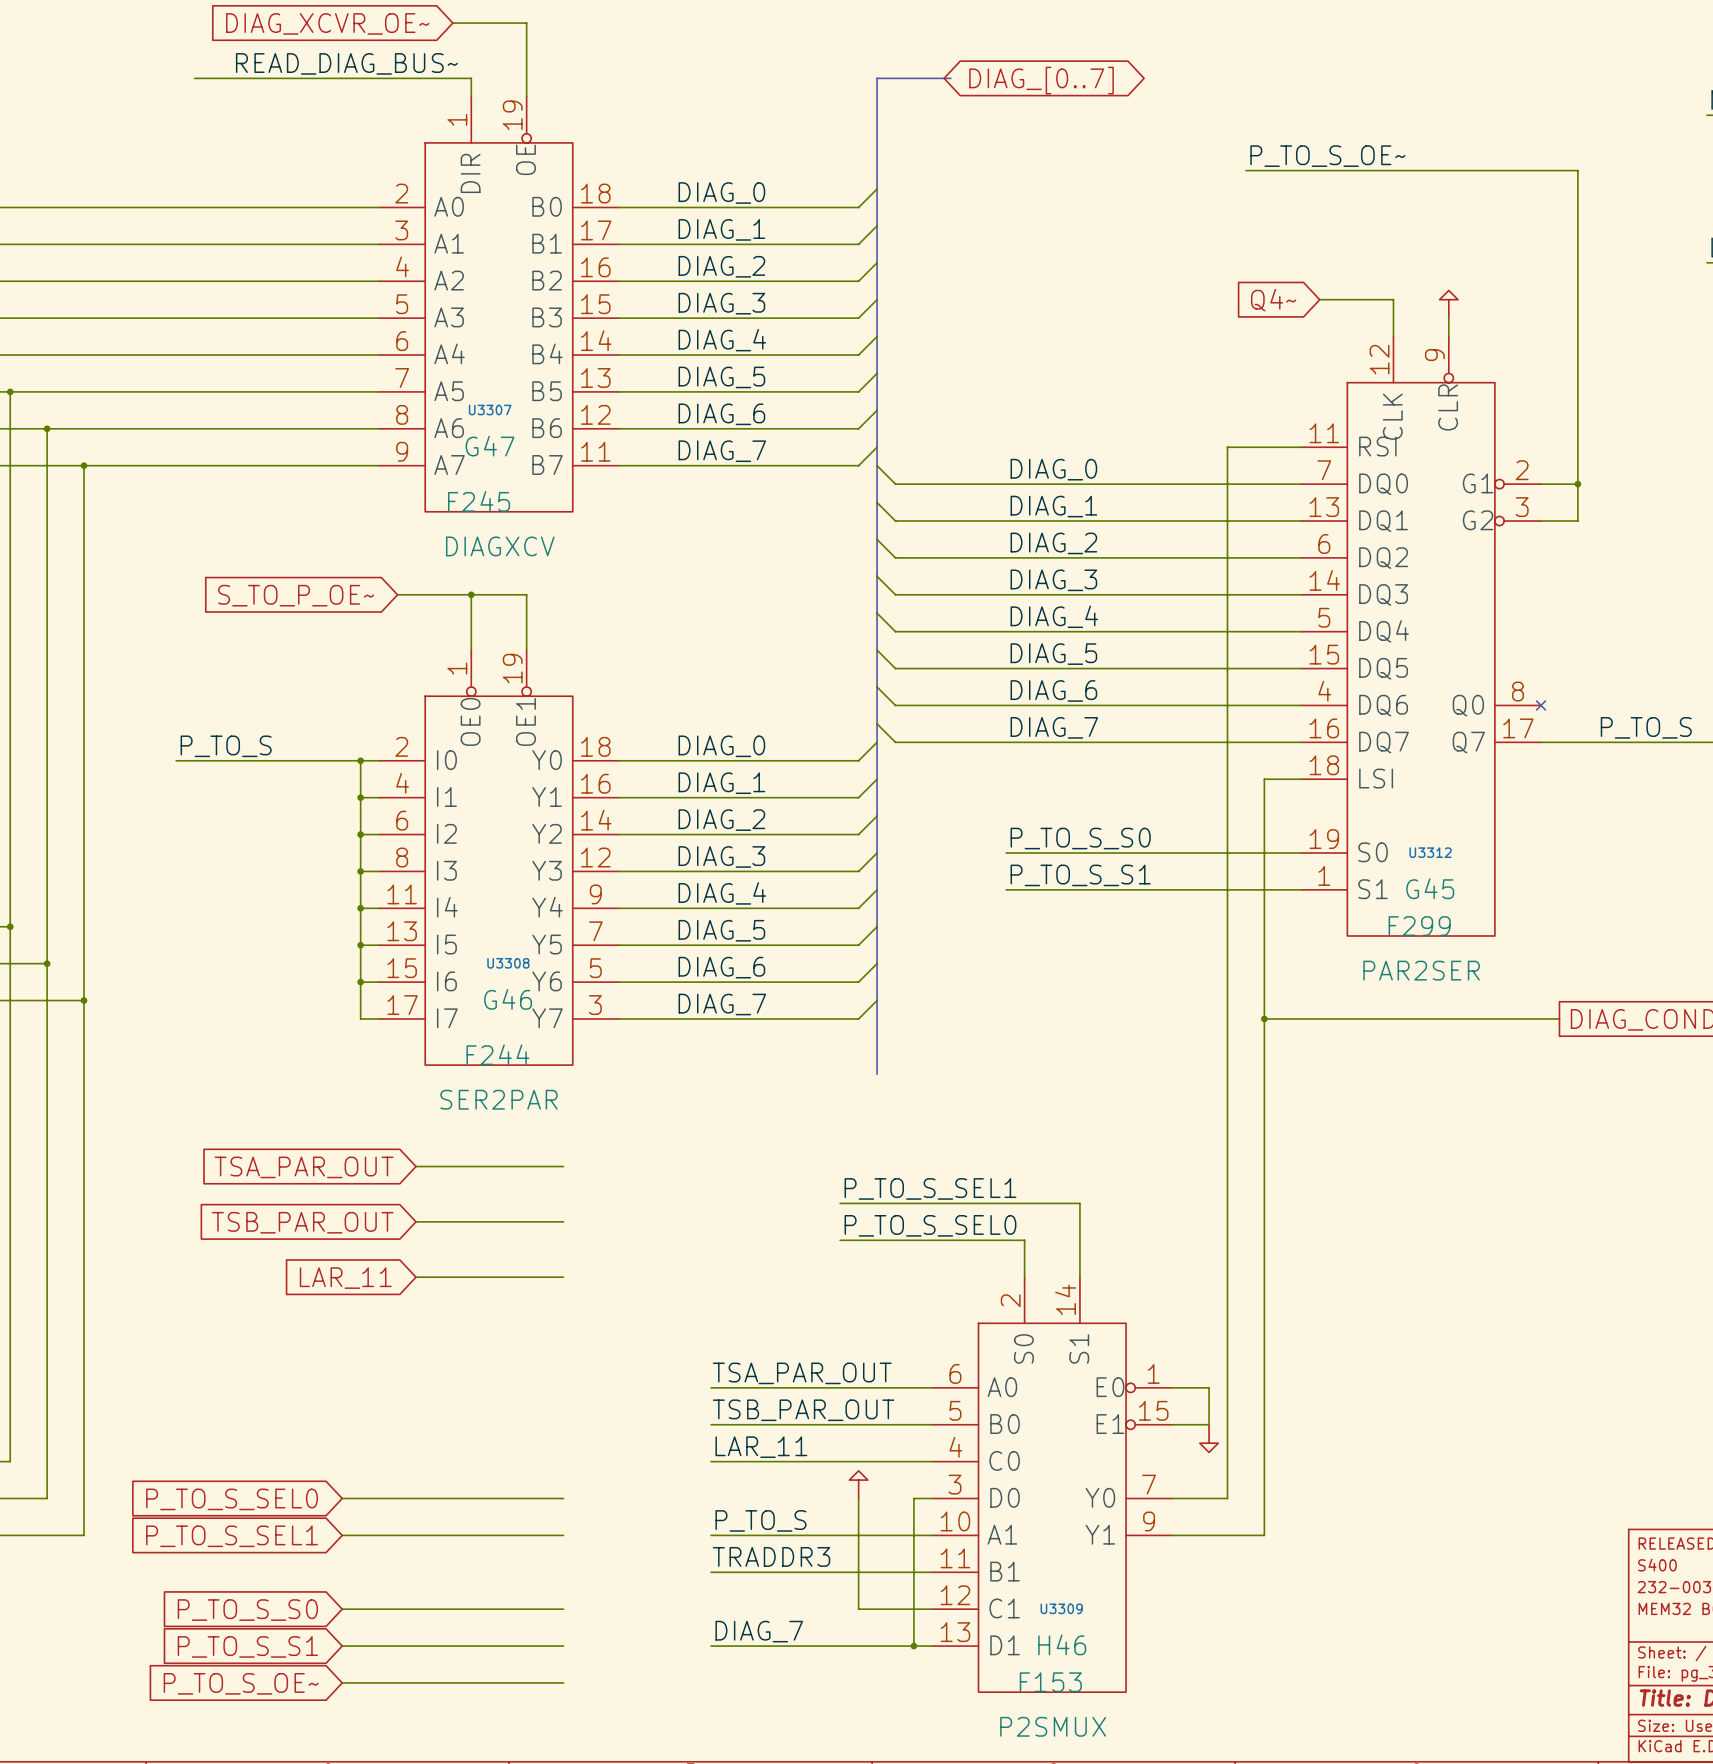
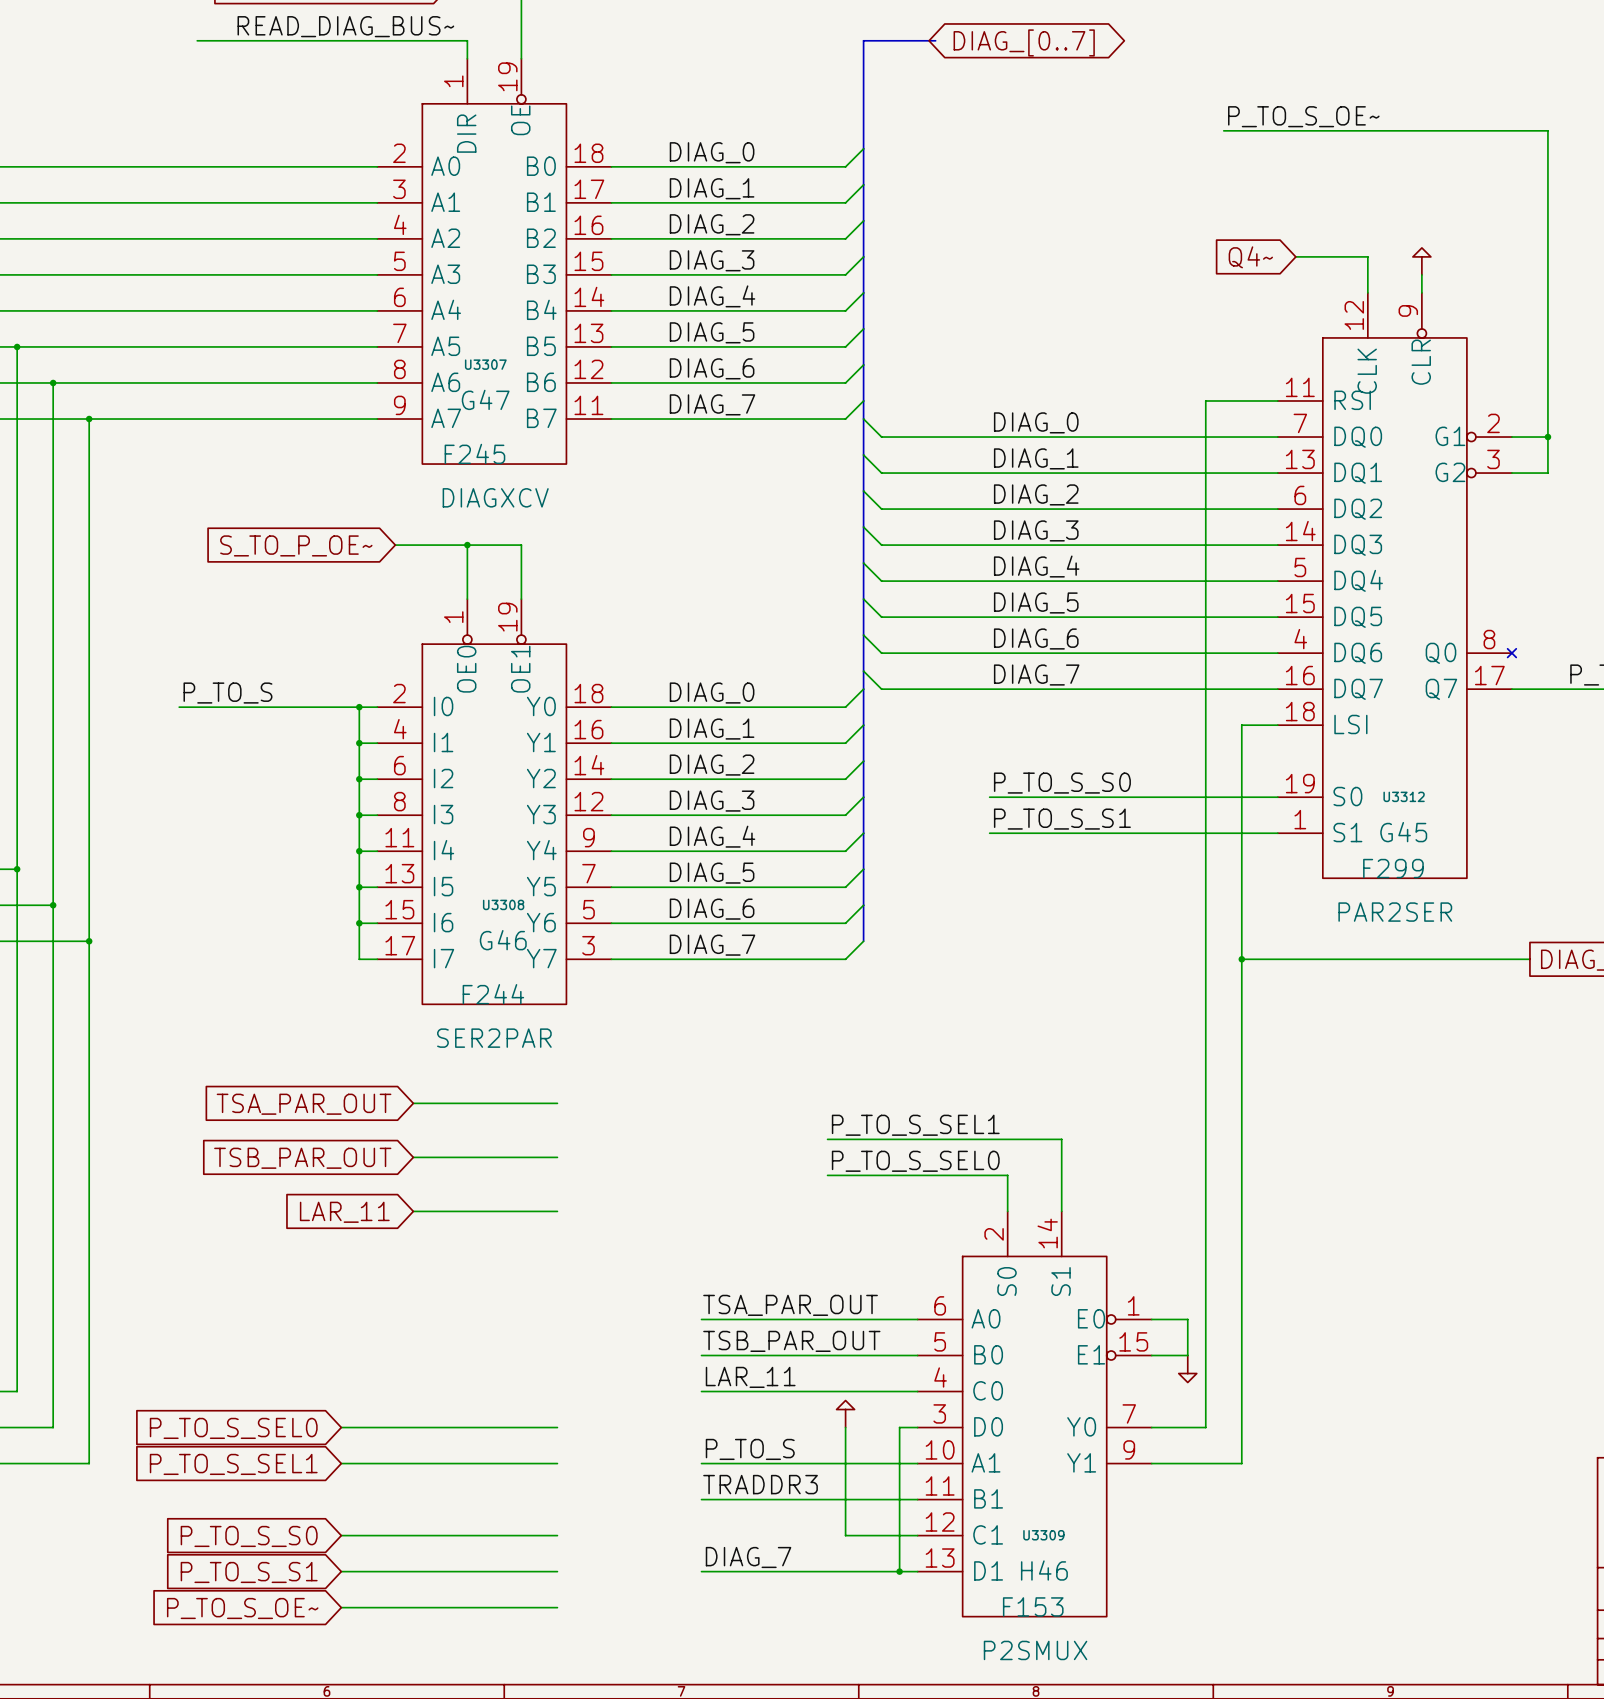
bus: (877, 1000) (877, 1074) -> none

